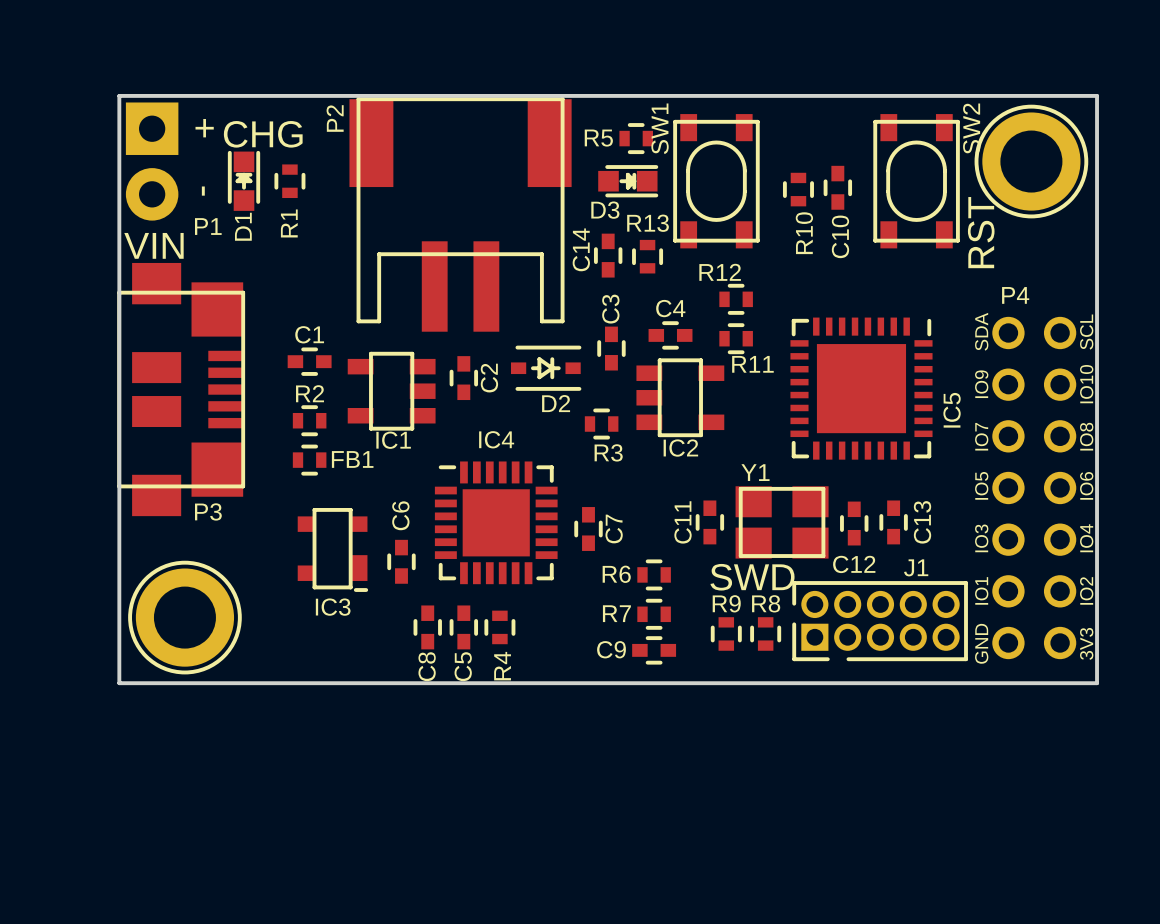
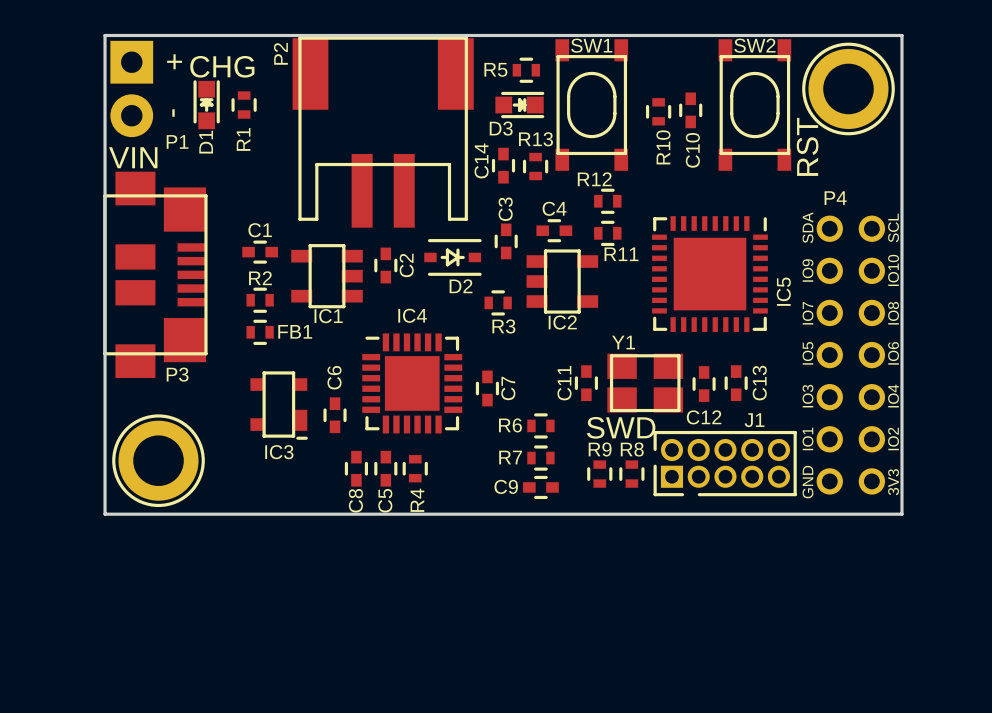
SW1 footprint: [673, 114, 760, 249] -> [555, 39, 629, 171]
SW2 footprint: [873, 114, 960, 249] -> [718, 39, 792, 171]
SW1 name rotation: 0° (660, 128) -> 90° clockwise (591, 45)
SW2 name rotation: 0° (971, 128) -> 90° clockwise (754, 45)

